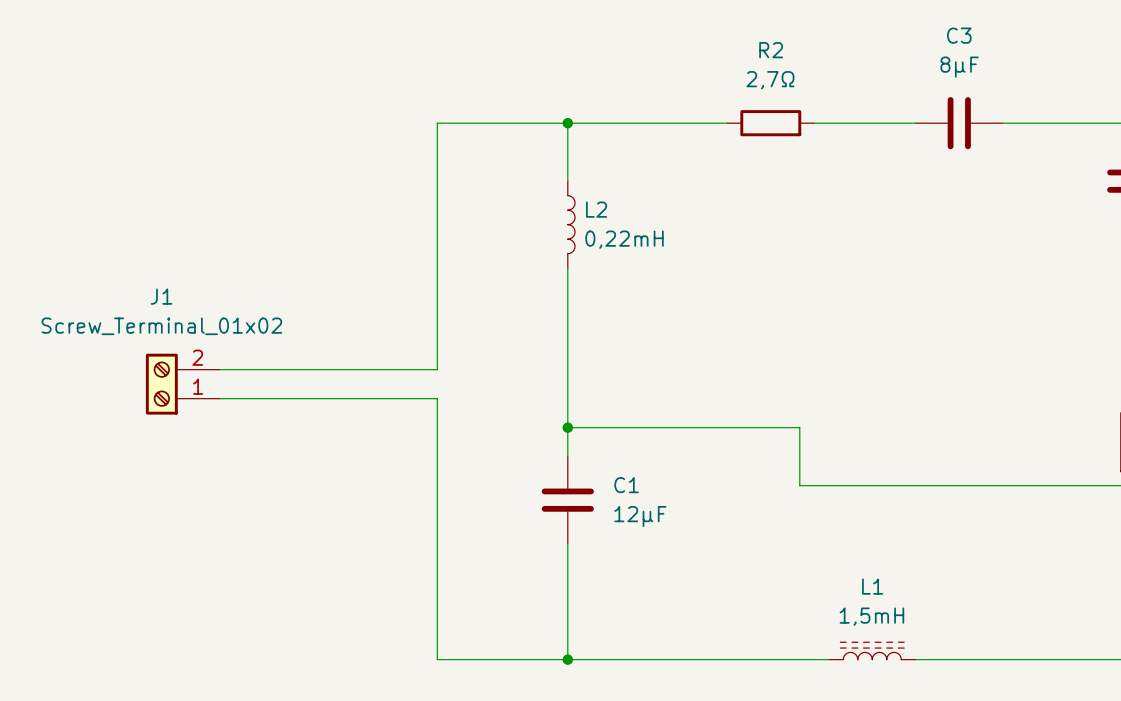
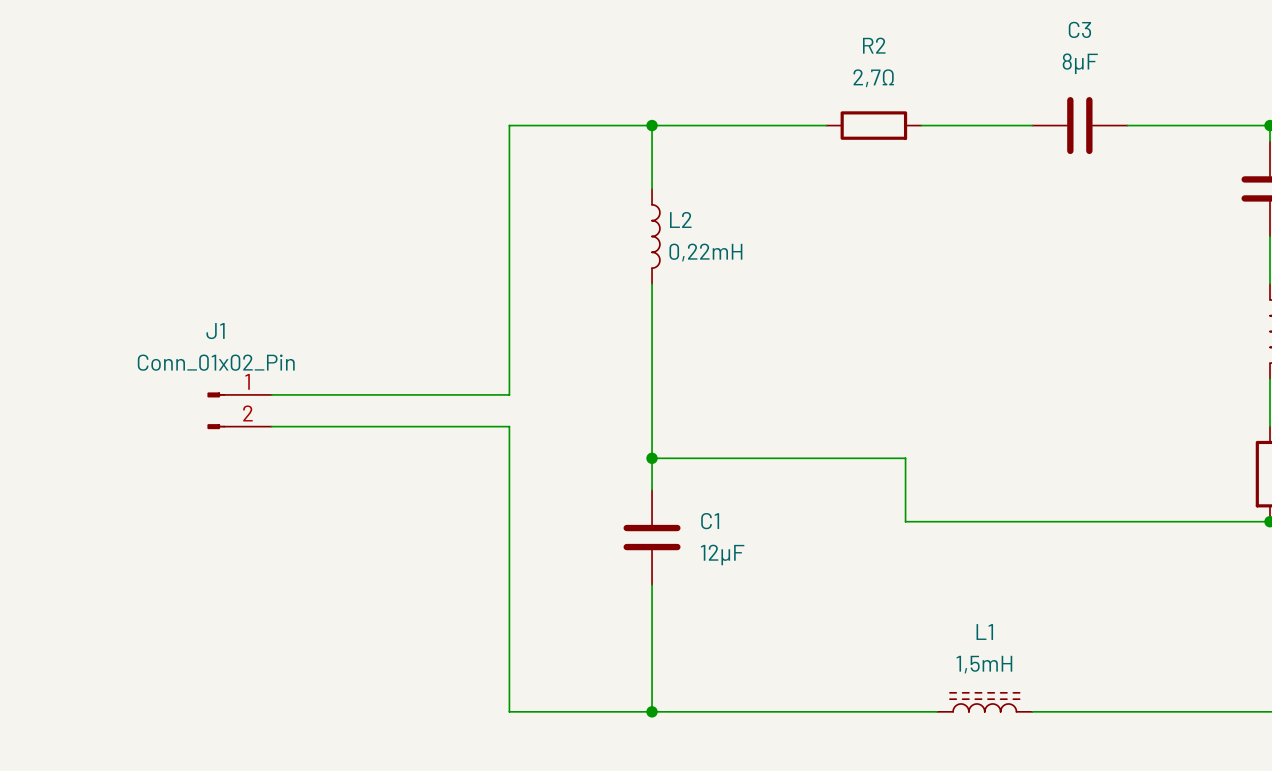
J1 value: Screw_Terminal_01x02 (161, 326) -> Conn_01x02_Pin (216, 362)
J1 symbol: [145, 353, 220, 415] -> [207, 392, 272, 430]

